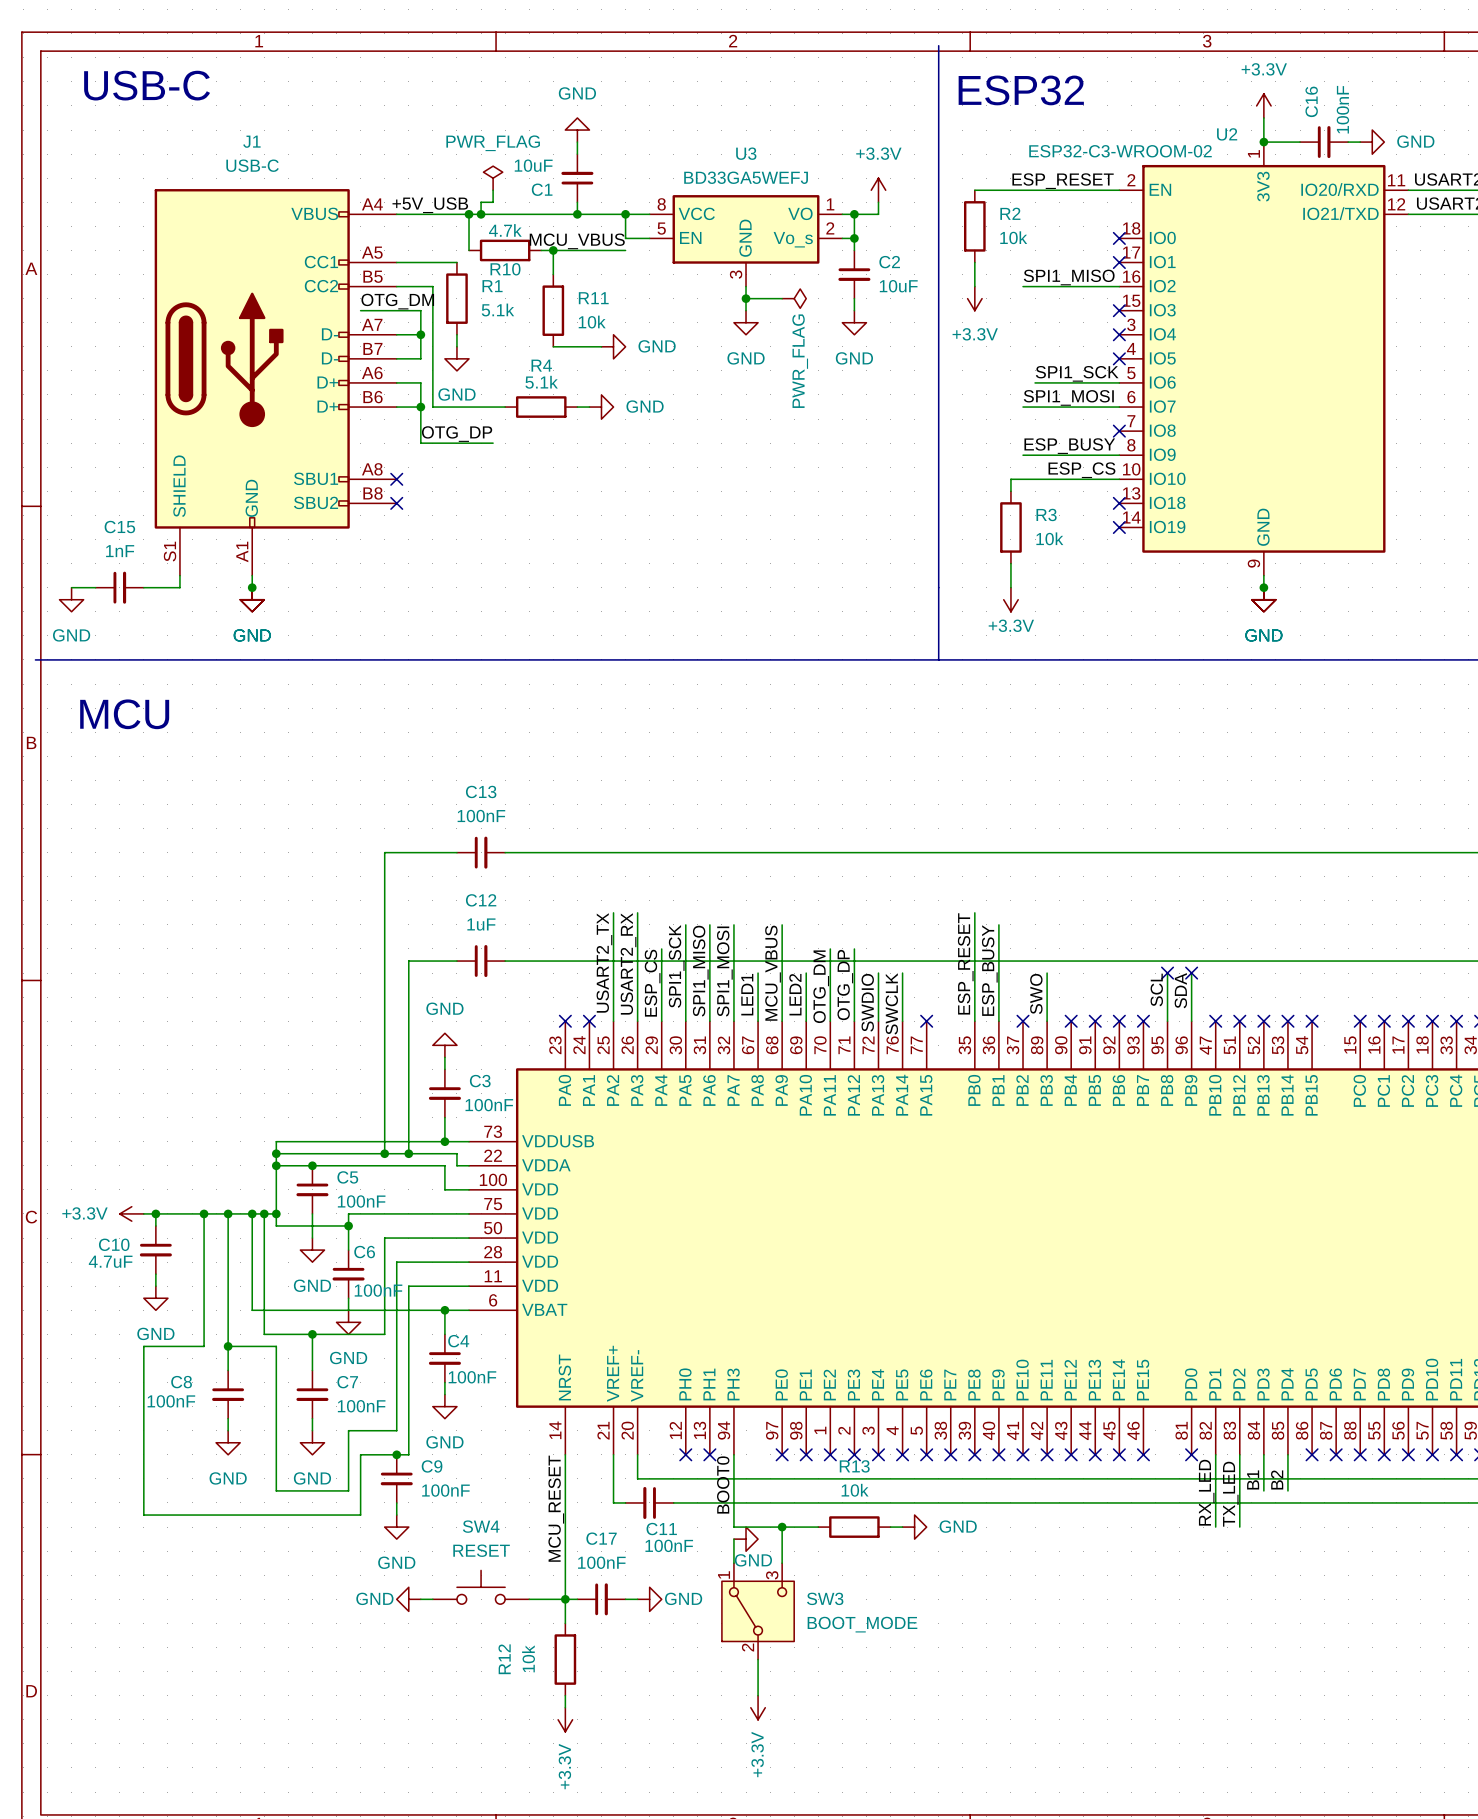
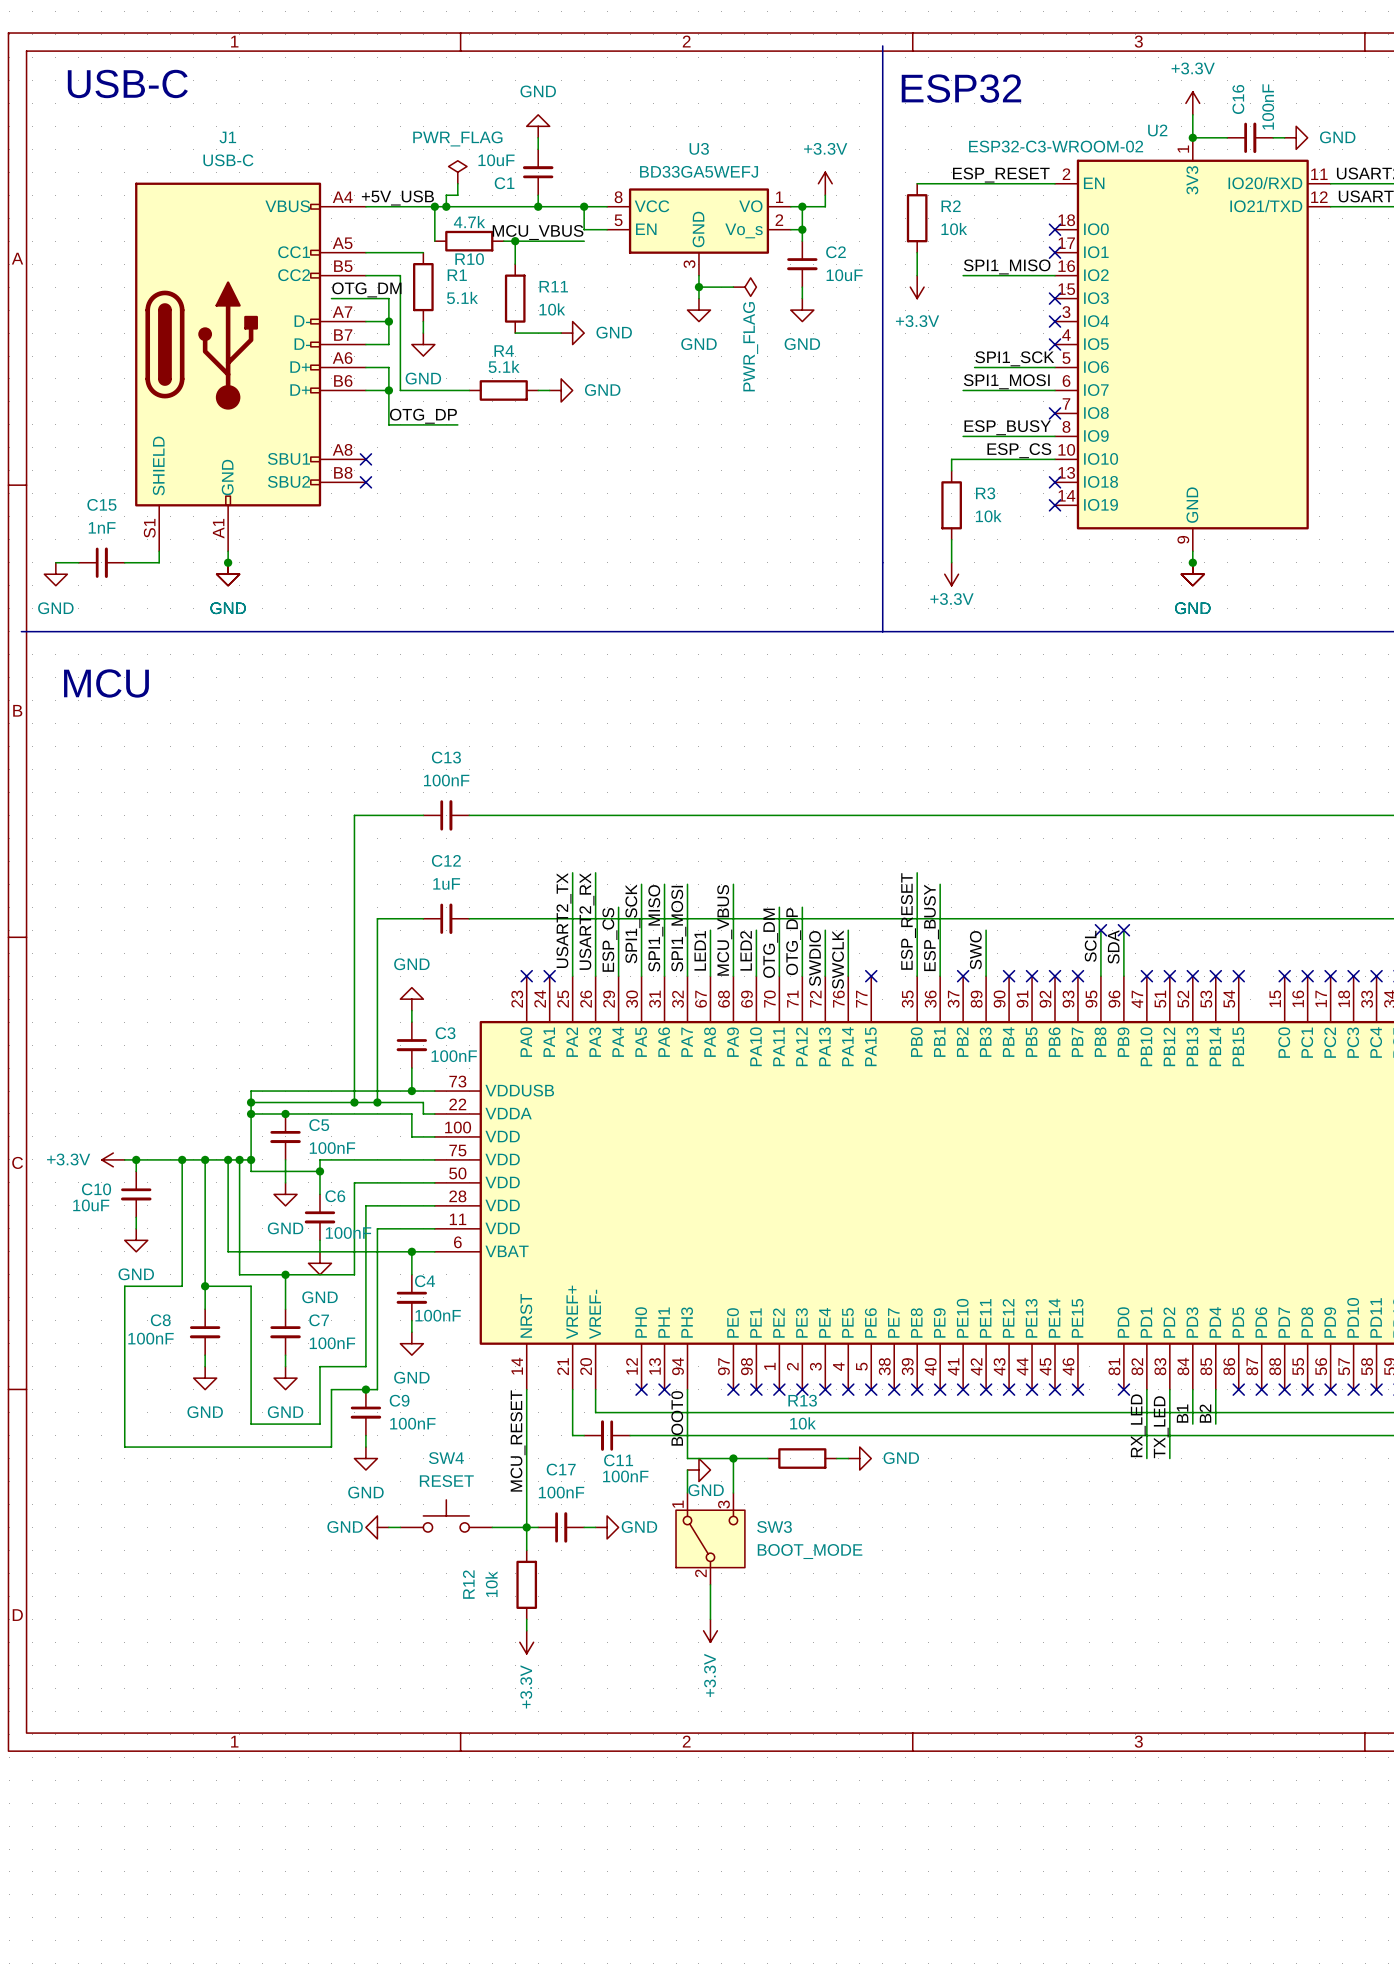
C10 value: 4.7uF (110, 1261) -> 10uF (91, 1205)

